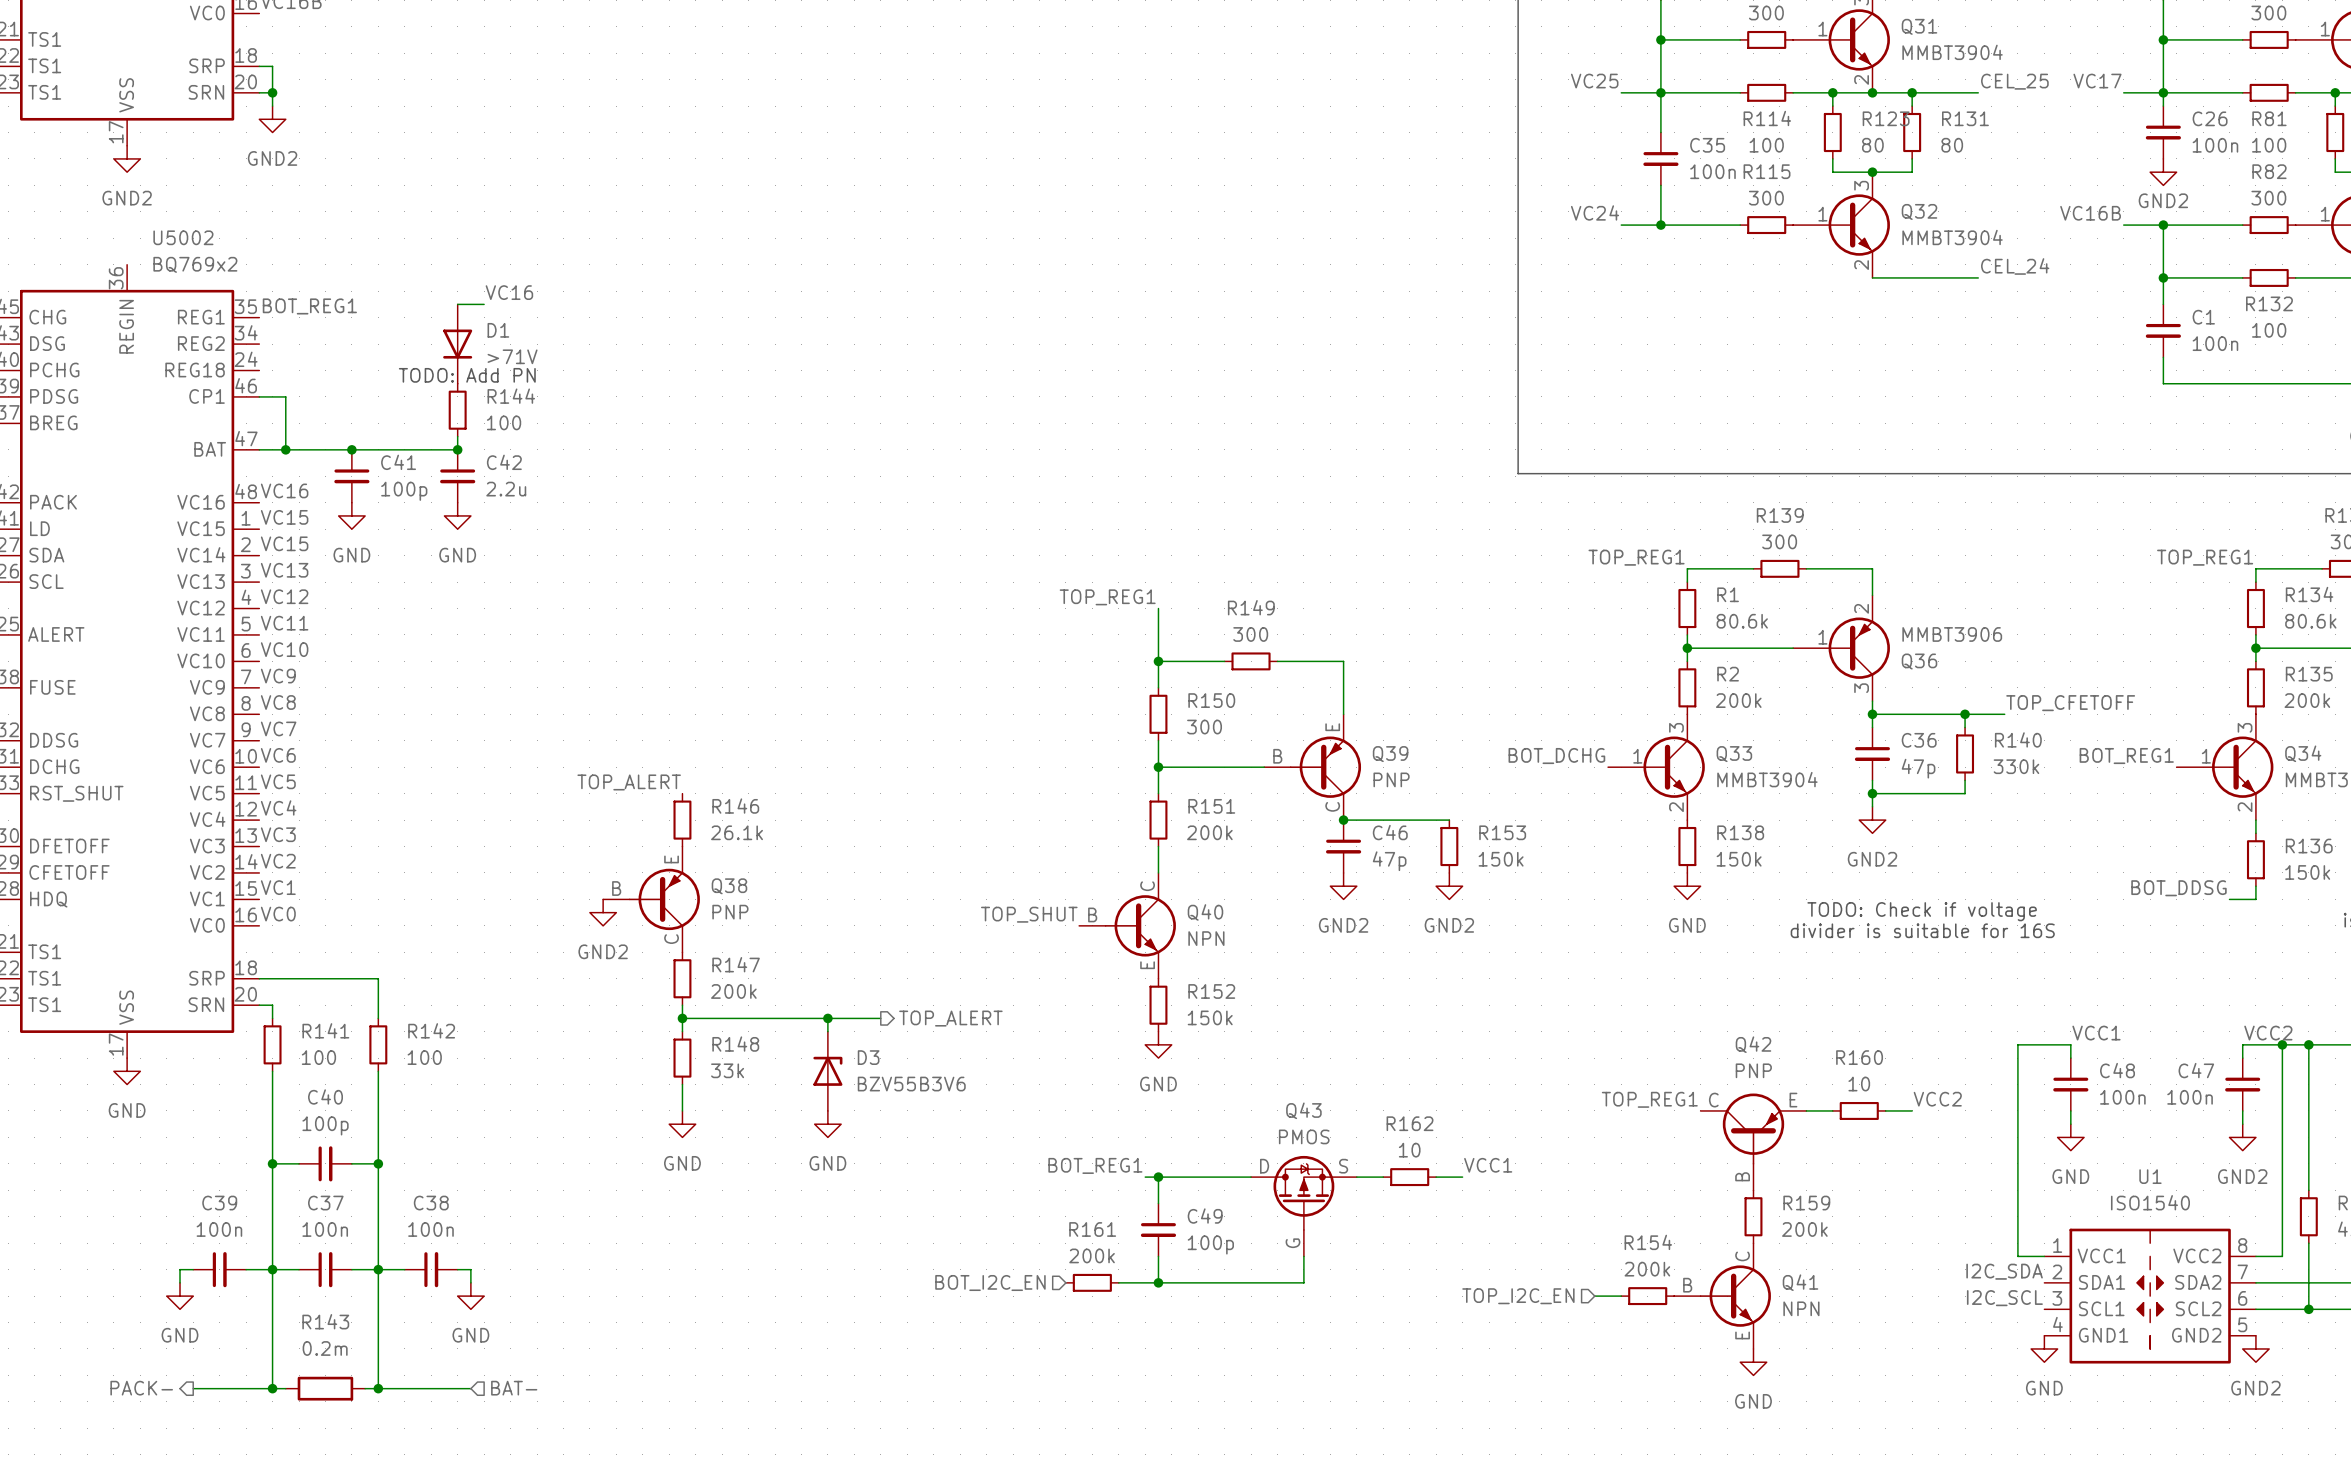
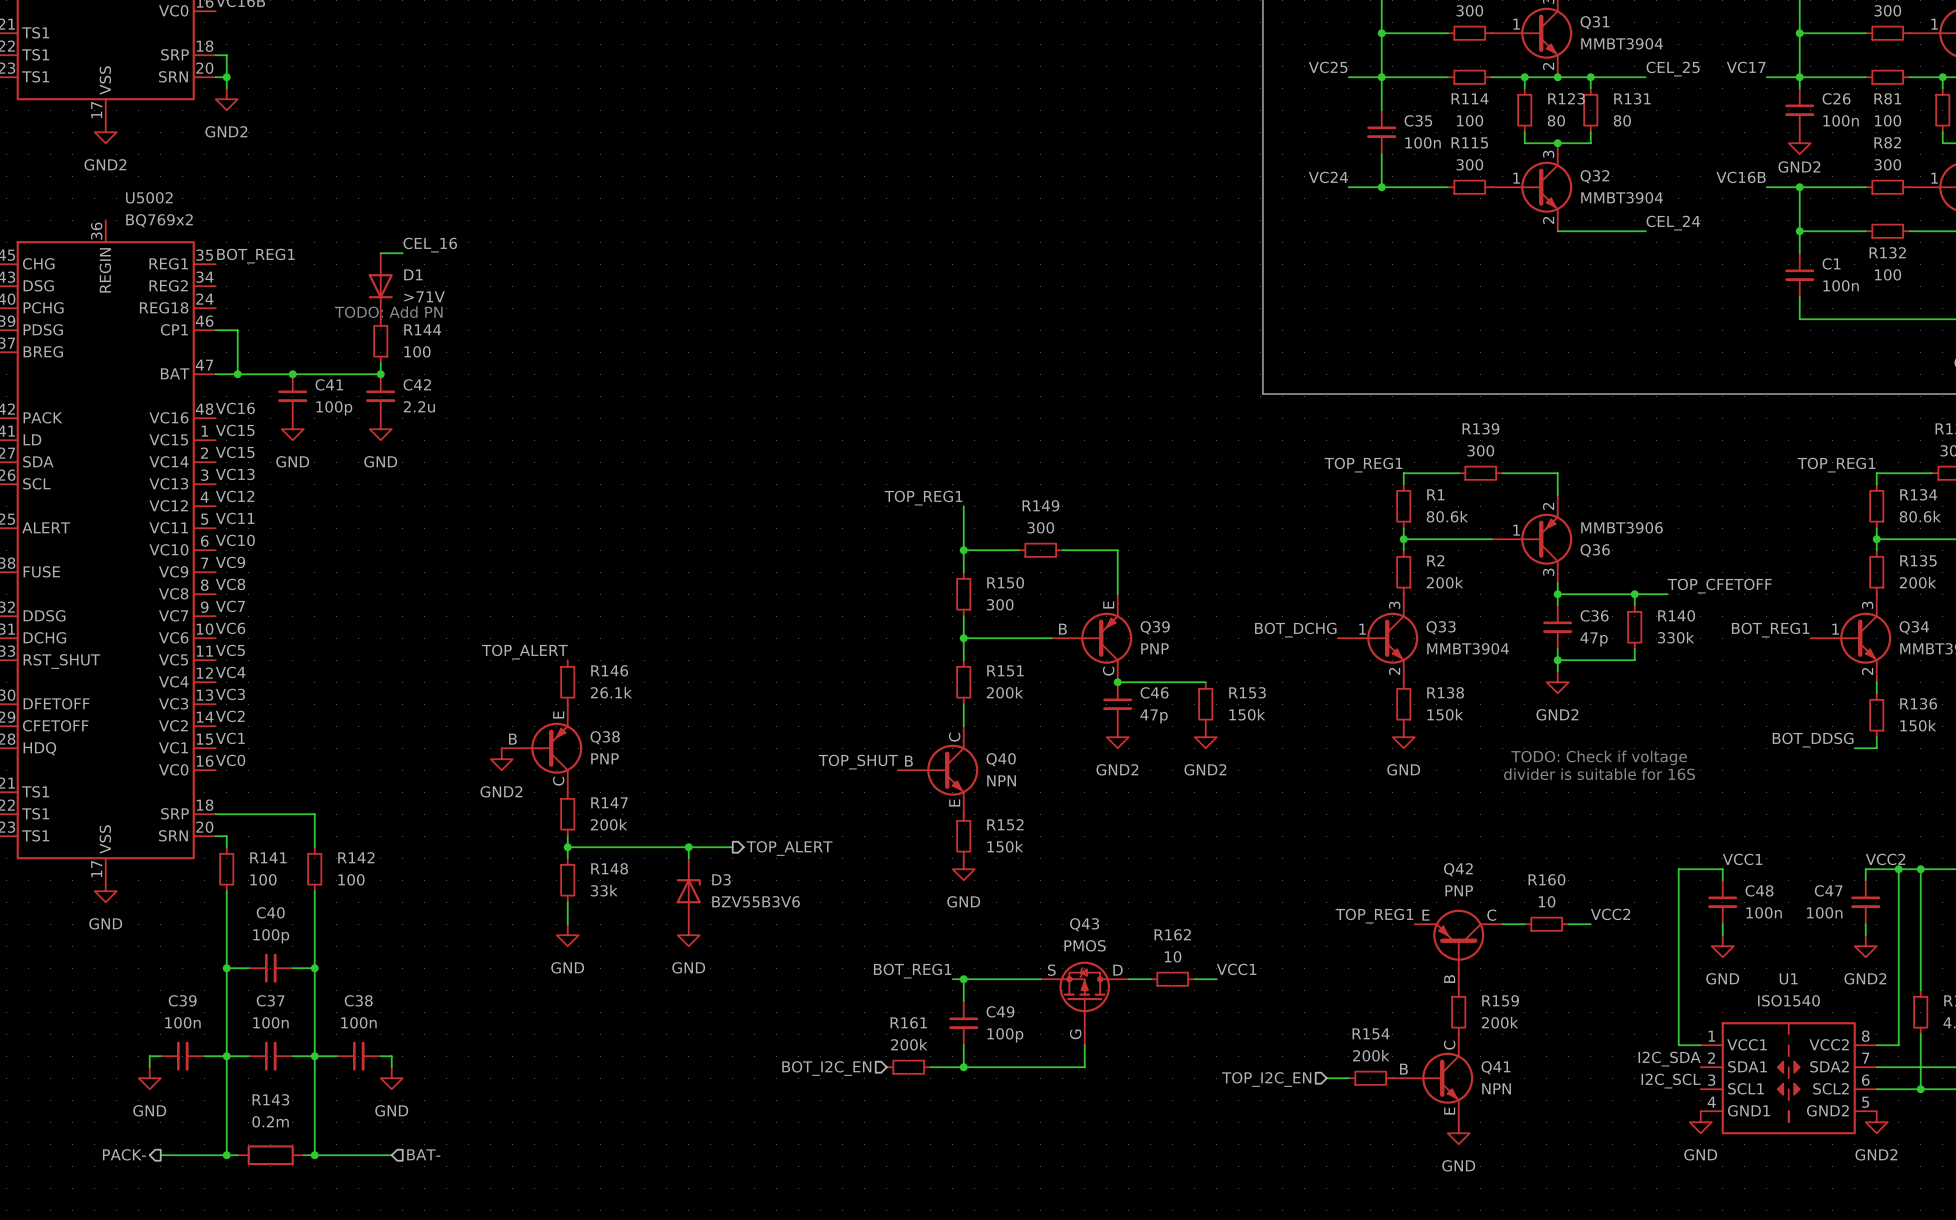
label: VC16 (509, 292) -> CEL_16 (430, 245)
Q42 flip: as is (1753, 1129) -> left-right (1458, 939)
Q43 flip: as is (1303, 1192) -> left-right (1084, 992)

